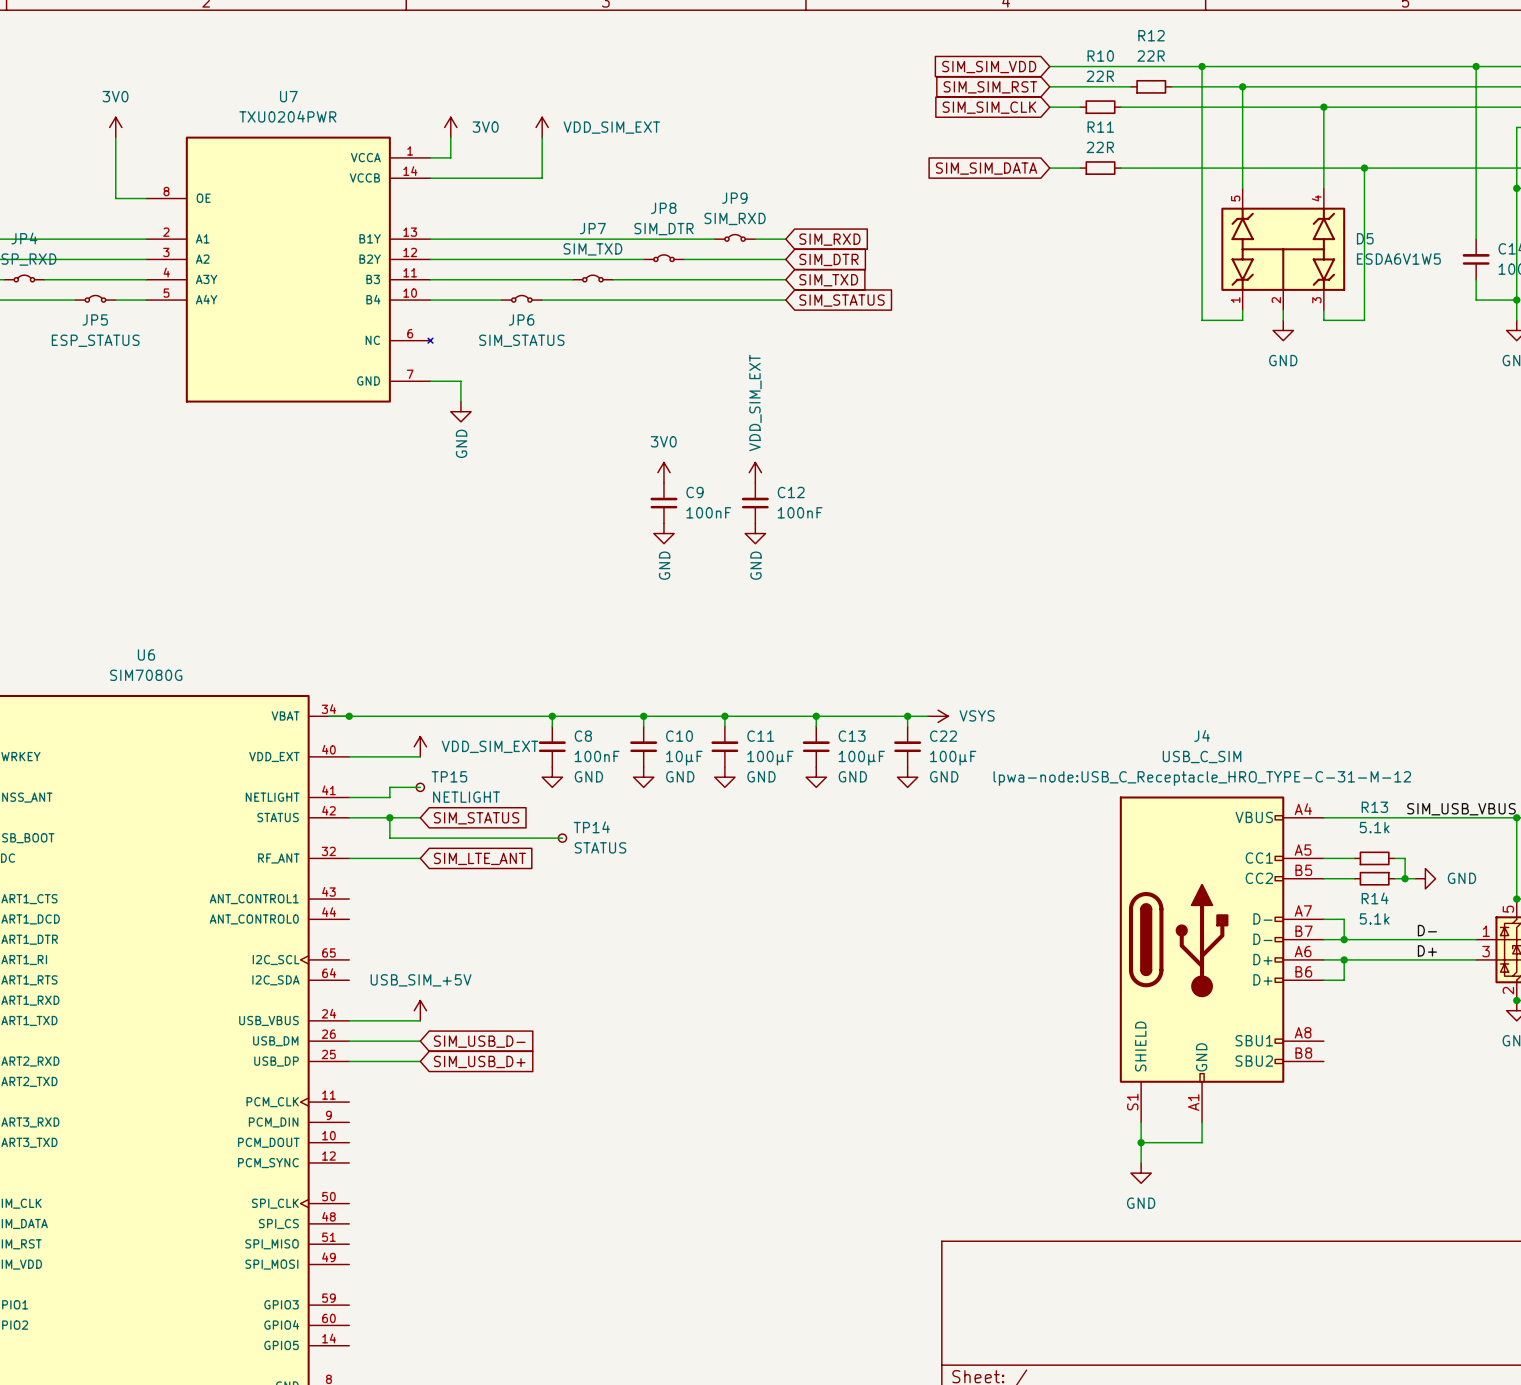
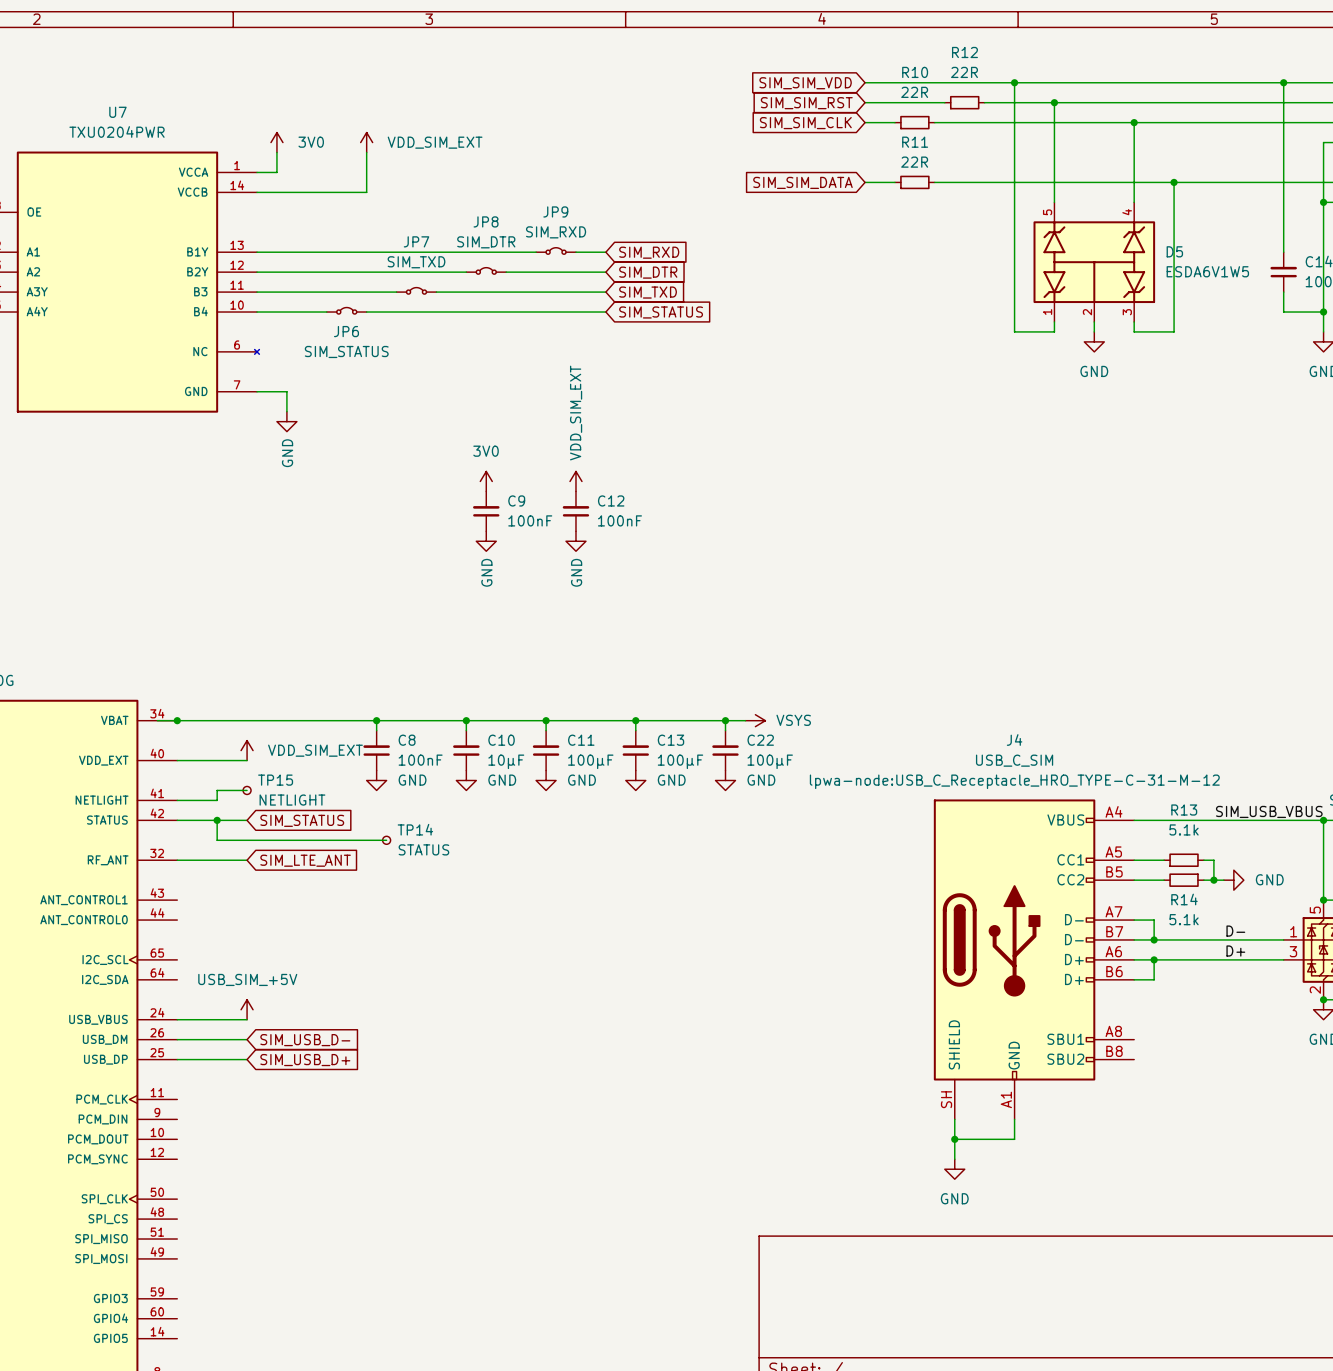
J4 pin number: S1 (1132, 1102) -> SH (946, 1099)

